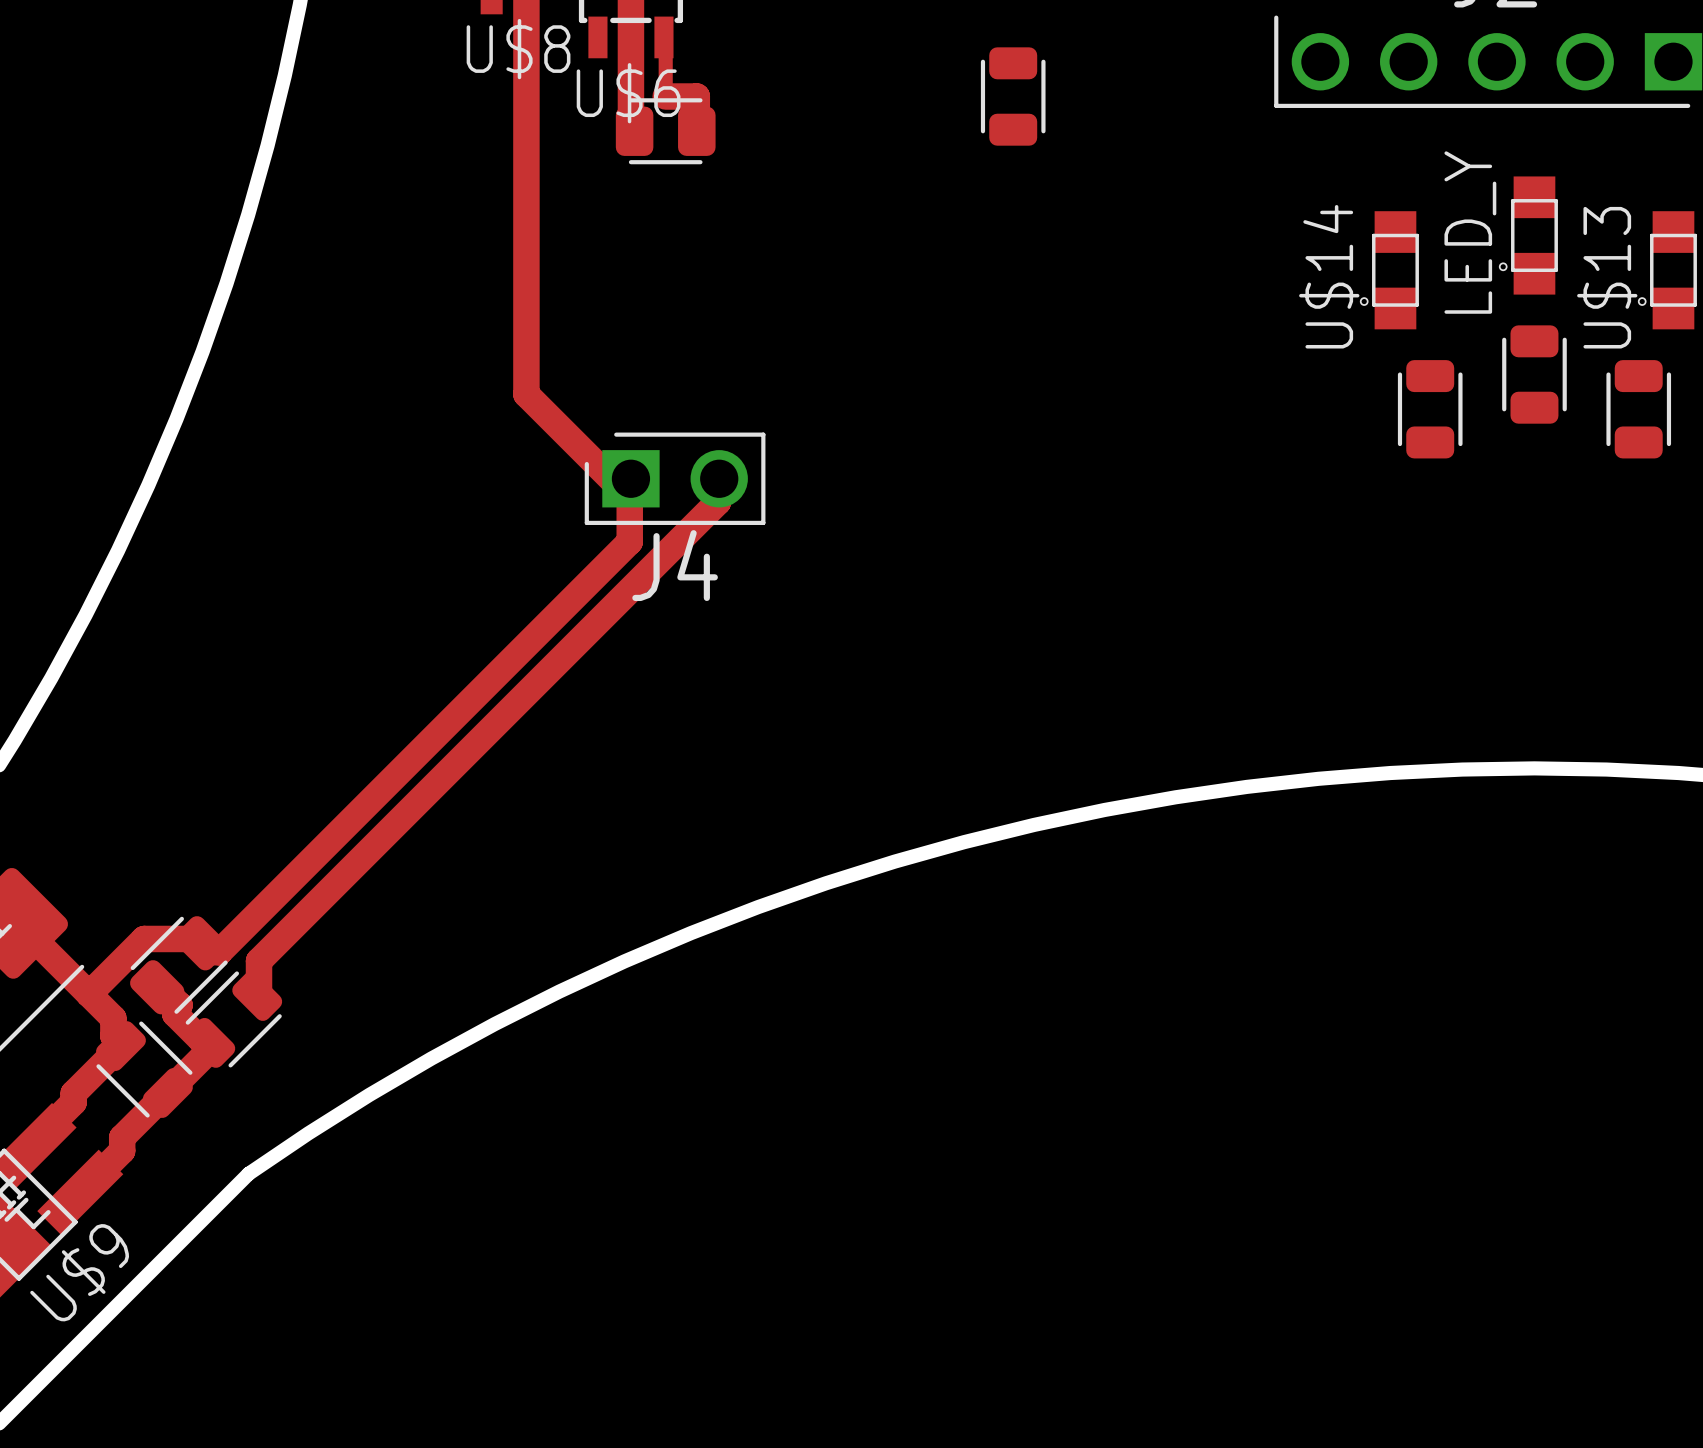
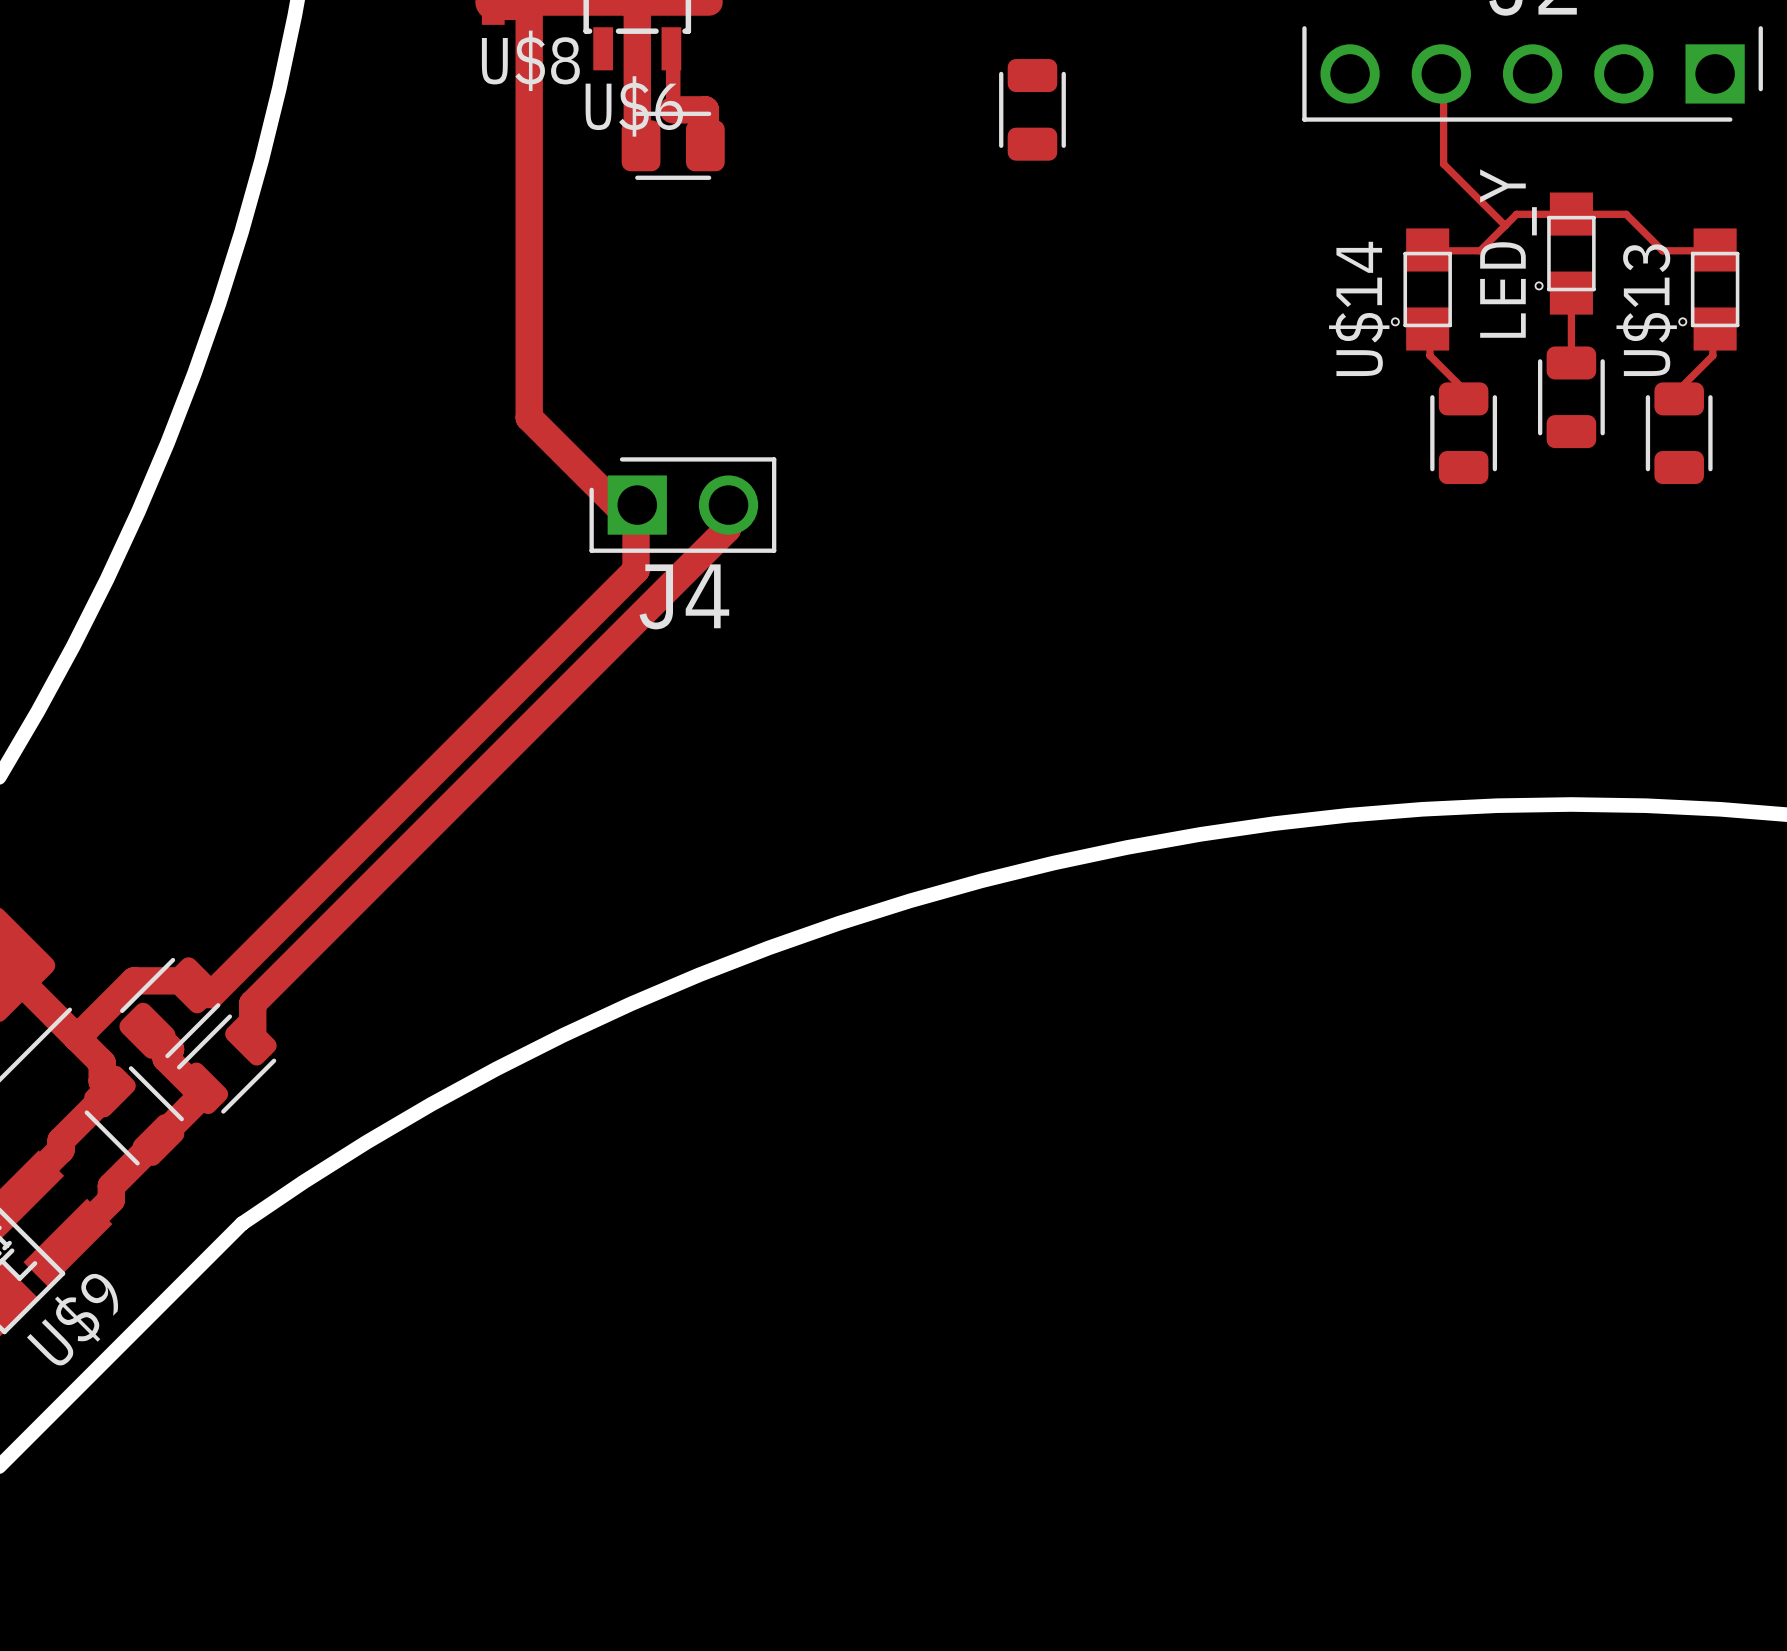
track: none -> (1441, 73) (1443, 77) (1443, 164) (1505, 225)
track: none -> (1427, 249) (1480, 250) (1516, 214) (1626, 214) (1662, 250) (1715, 249)
track: none -> (1571, 293) (1571, 362)
track: none -> (1427, 329) (1429, 332) (1429, 355) (1471, 396) (1466, 401) (1463, 398)
track: none -> (1715, 329) (1712, 332) (1712, 355) (1671, 396) (1676, 401) (1679, 398)

